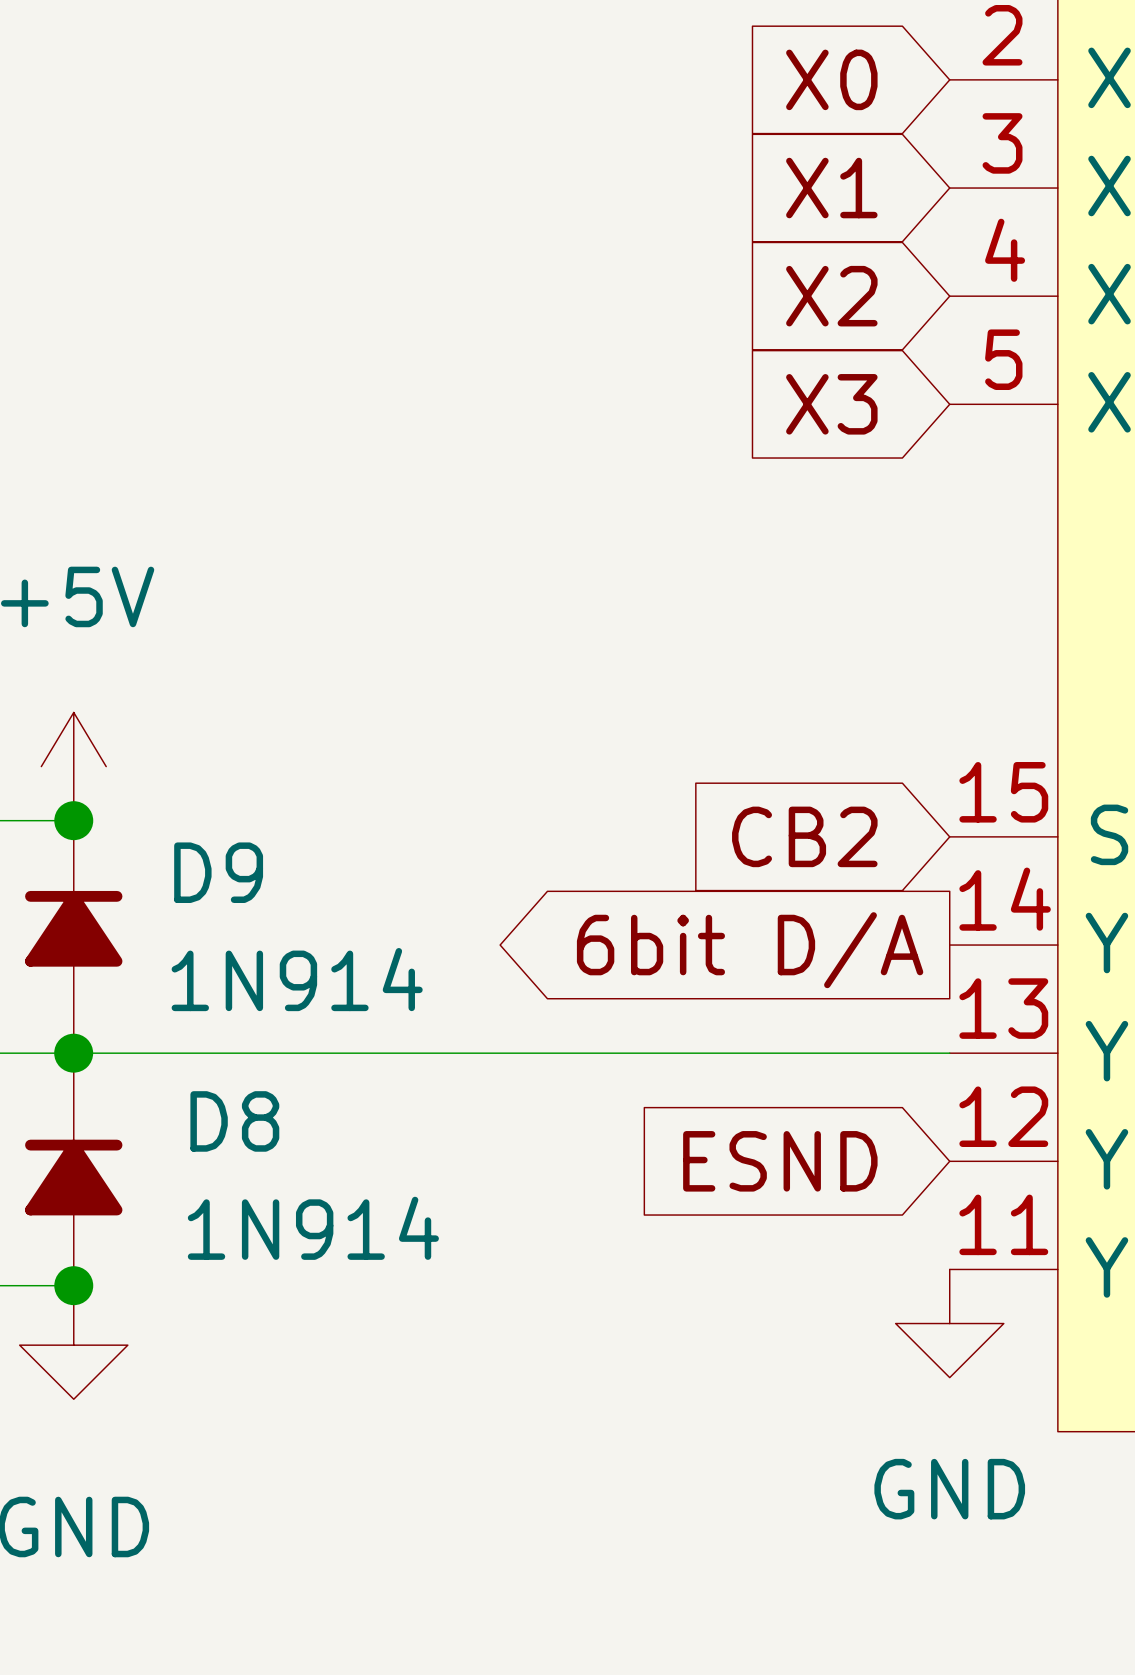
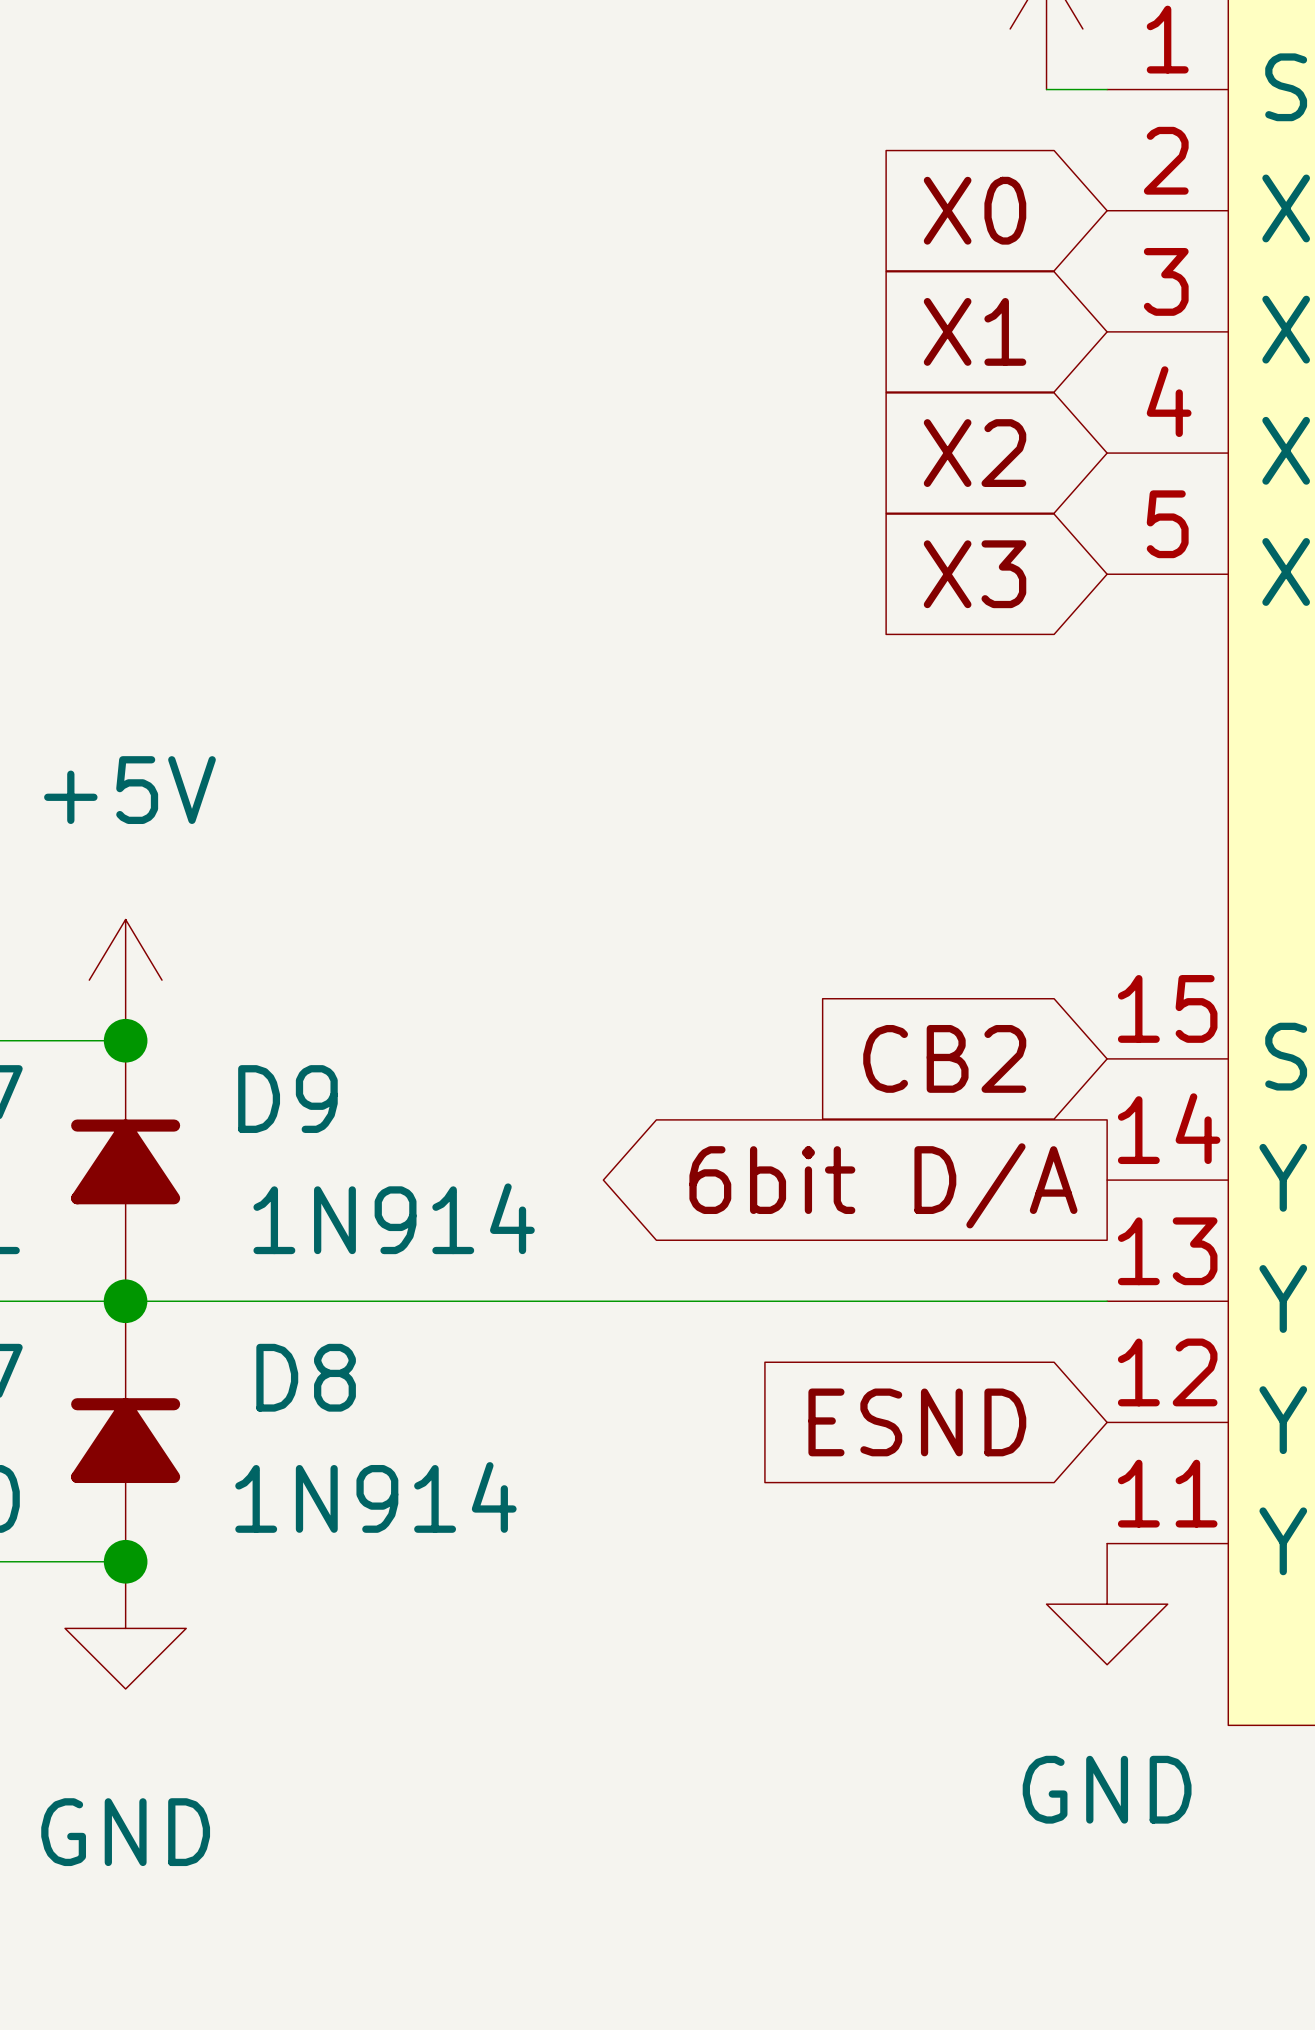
D9 value position: 1N914 (297, 979) -> 1N914 (394, 1218)
D8 value position: 1N914 (313, 1228) -> 1N914 (375, 1497)

